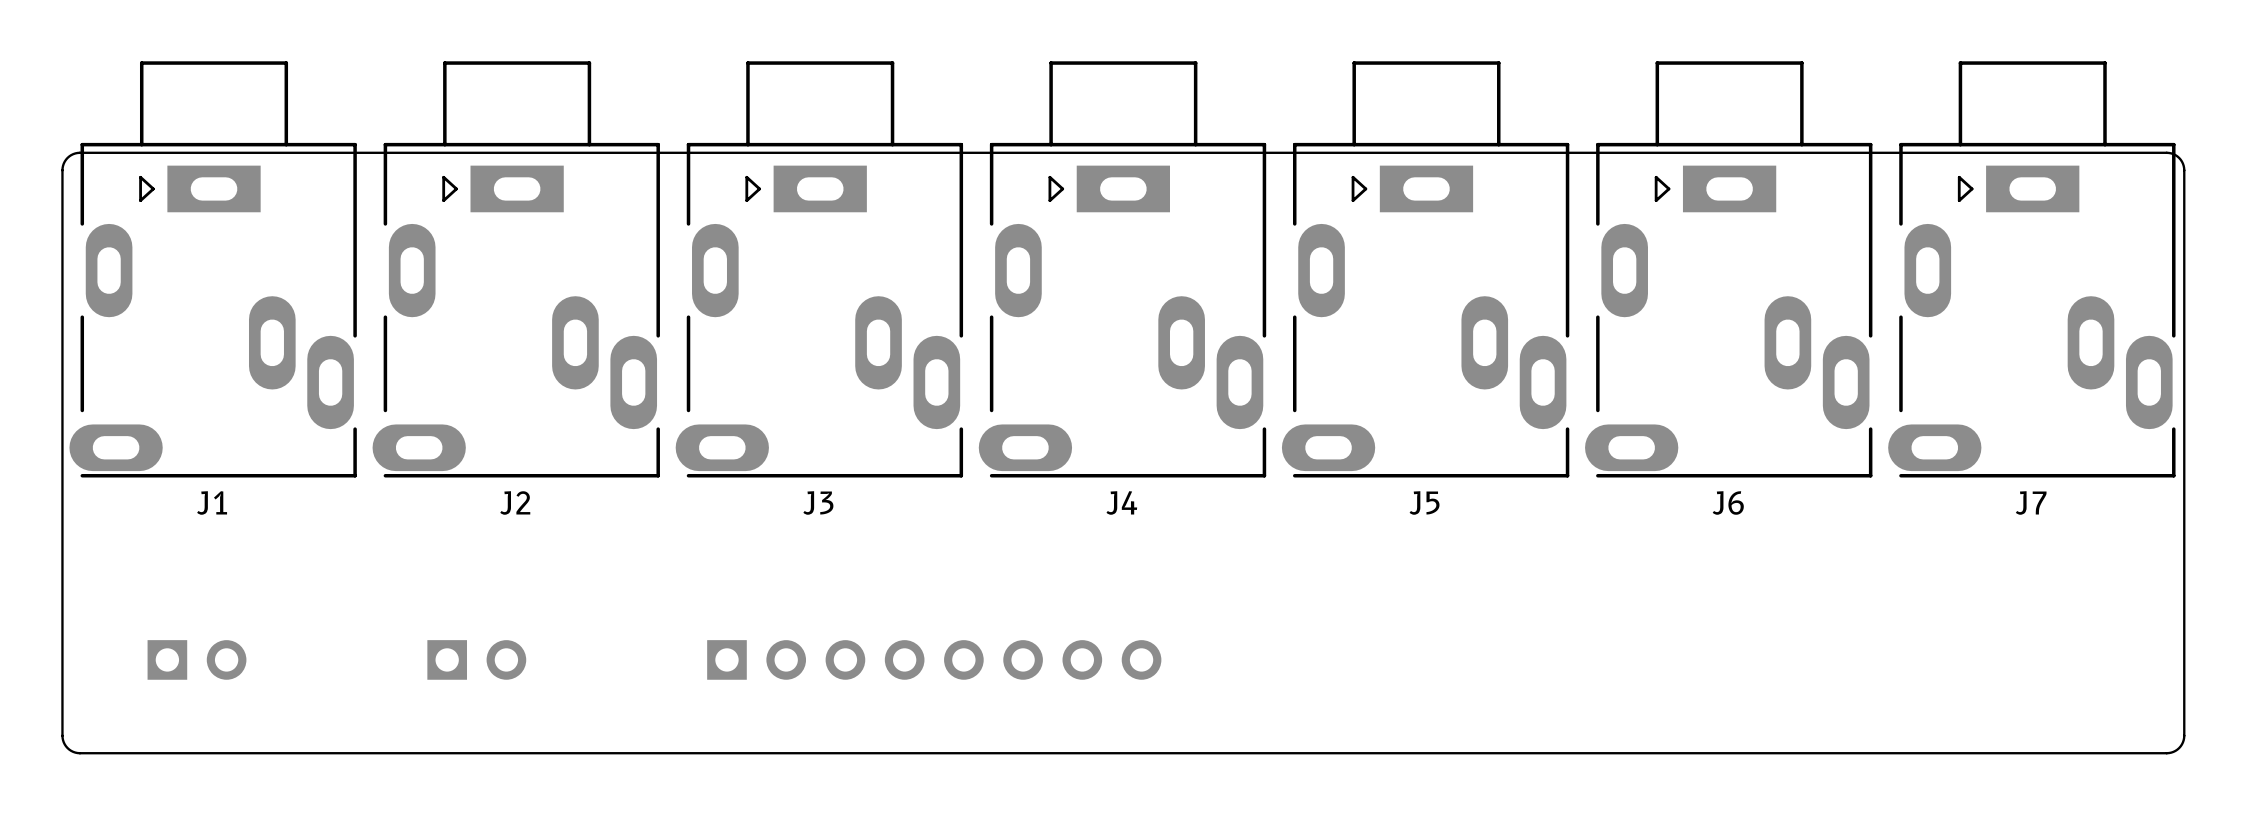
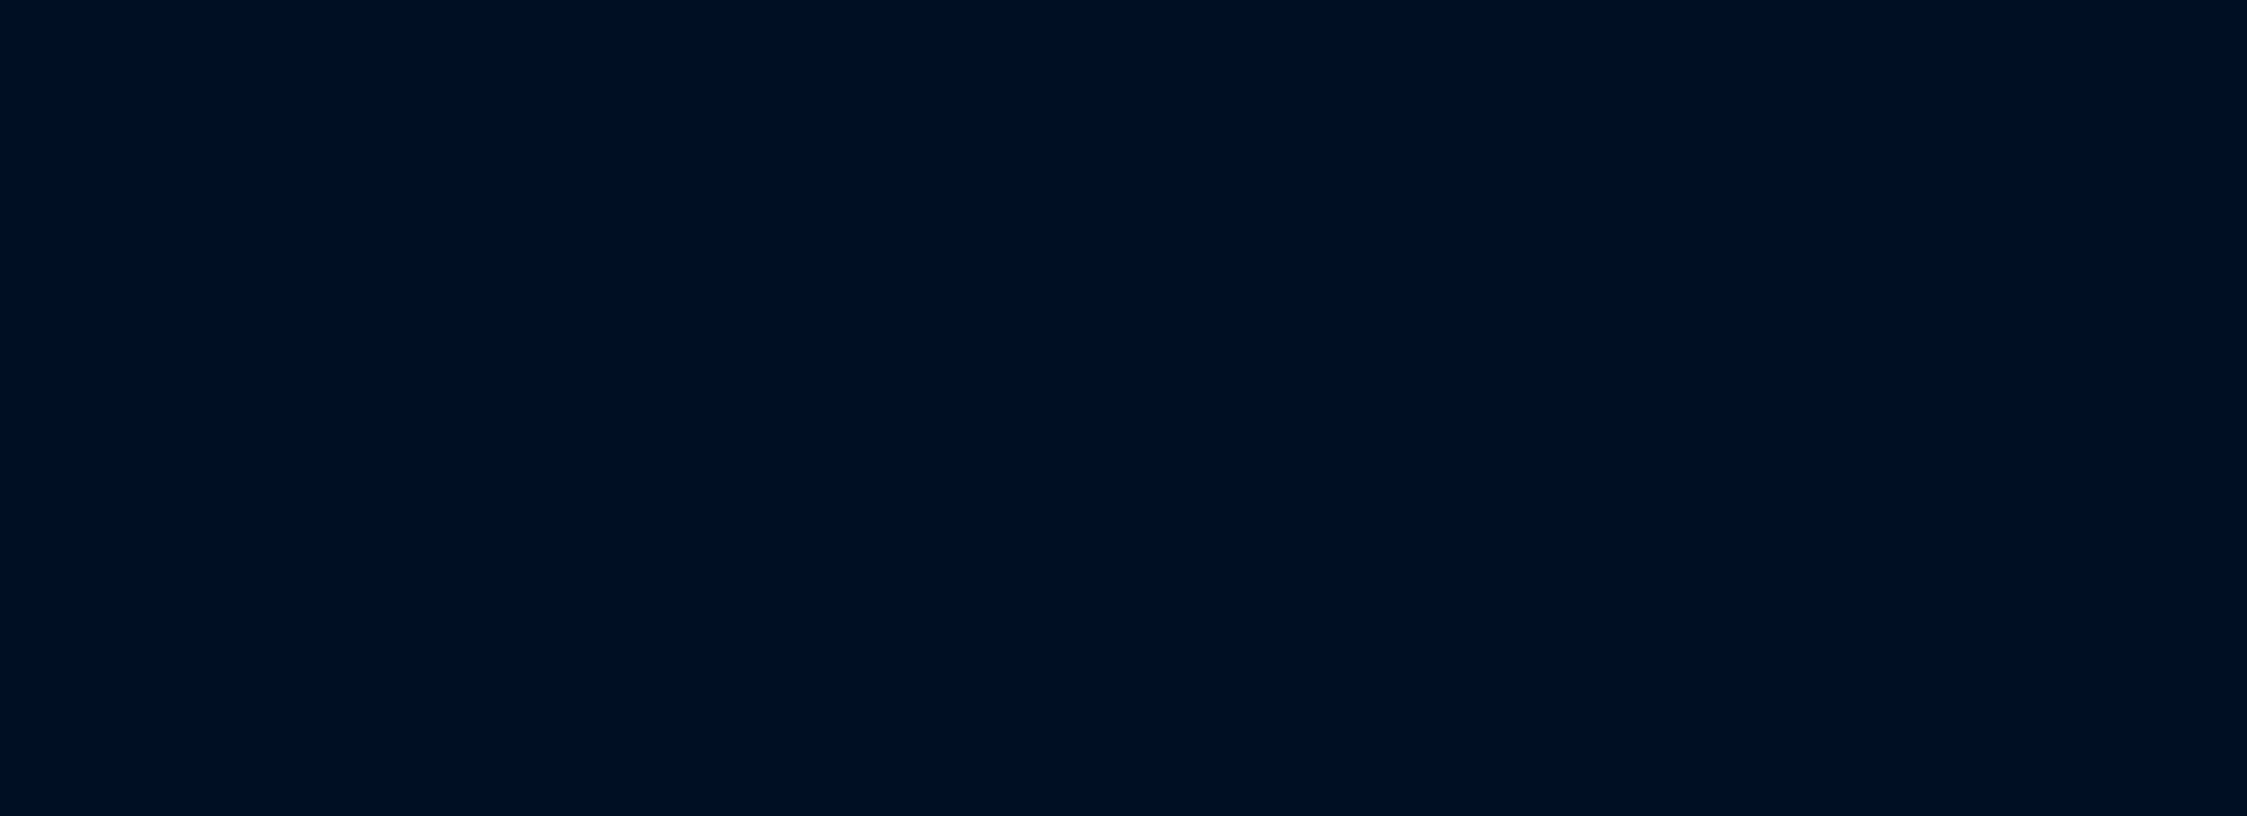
board edge: (2166, 152) (75, 153) (66, 159) (62, 170) (63, 740) (69, 749) (79, 753) (2171, 752) (2180, 746) (2184, 735) (2184, 170) (2179, 157) (2166, 152) -> none
J1: (213, 269) -> none
J2: (516, 269) -> none
J3: (819, 269) -> none
J4: (1122, 269) -> none
J5: (1425, 269) -> none
J6: (1728, 269) -> none
J7: (2031, 269) -> none
part: (196, 659) -> none
part: (476, 659) -> none
part: (934, 659) -> none

